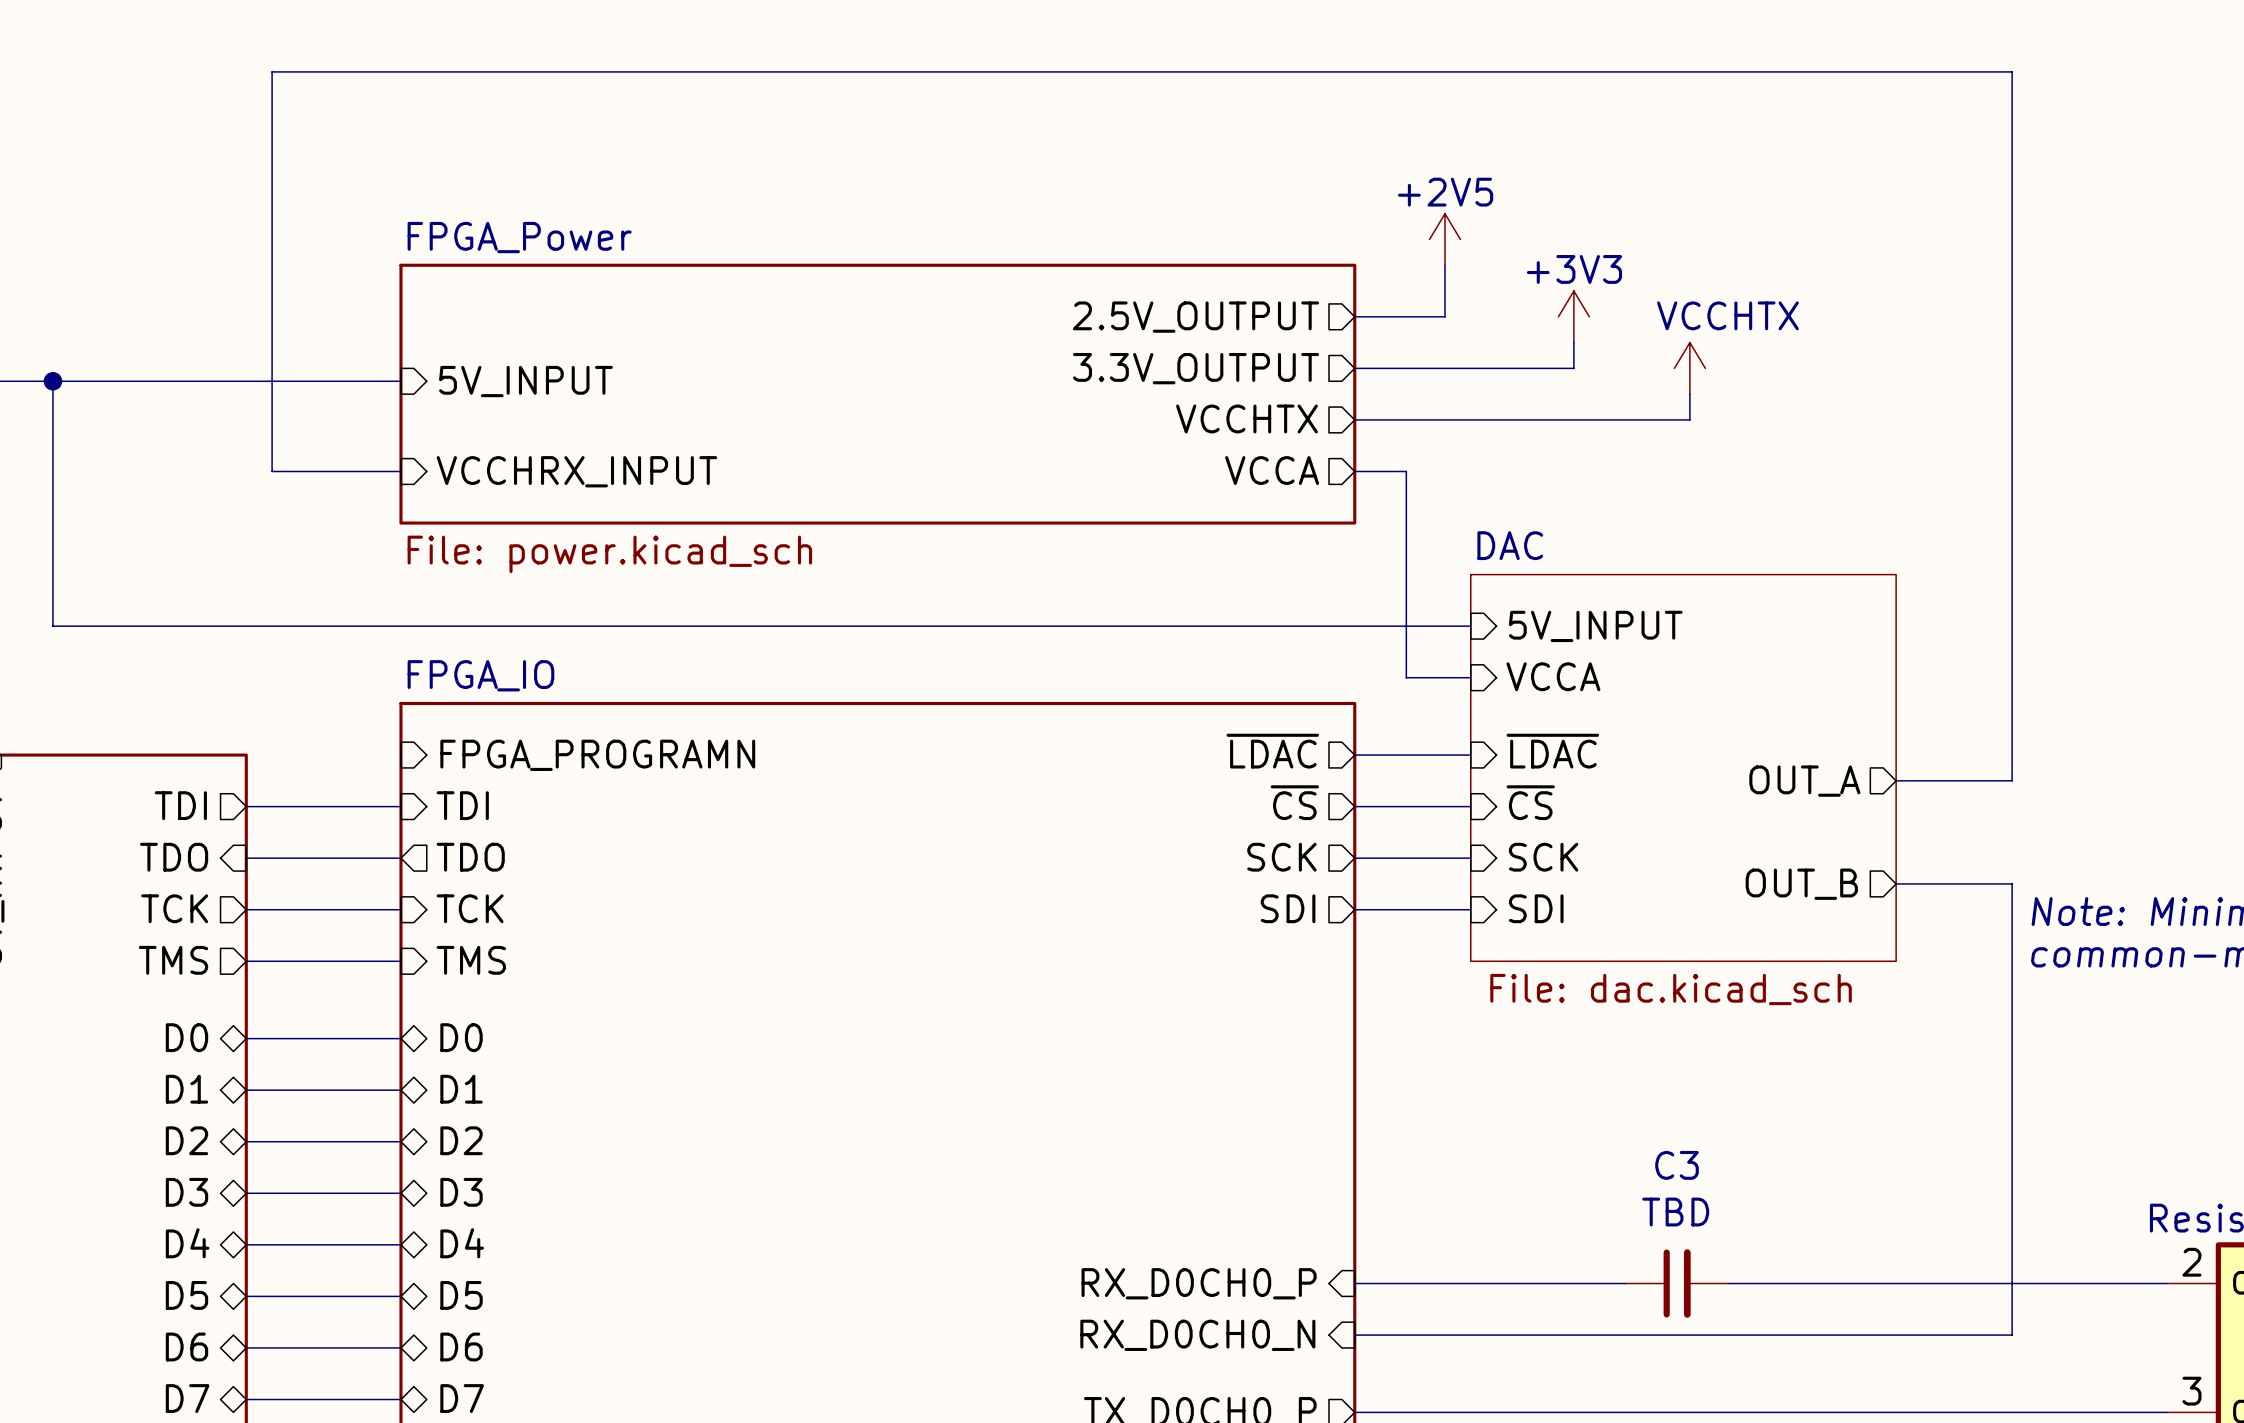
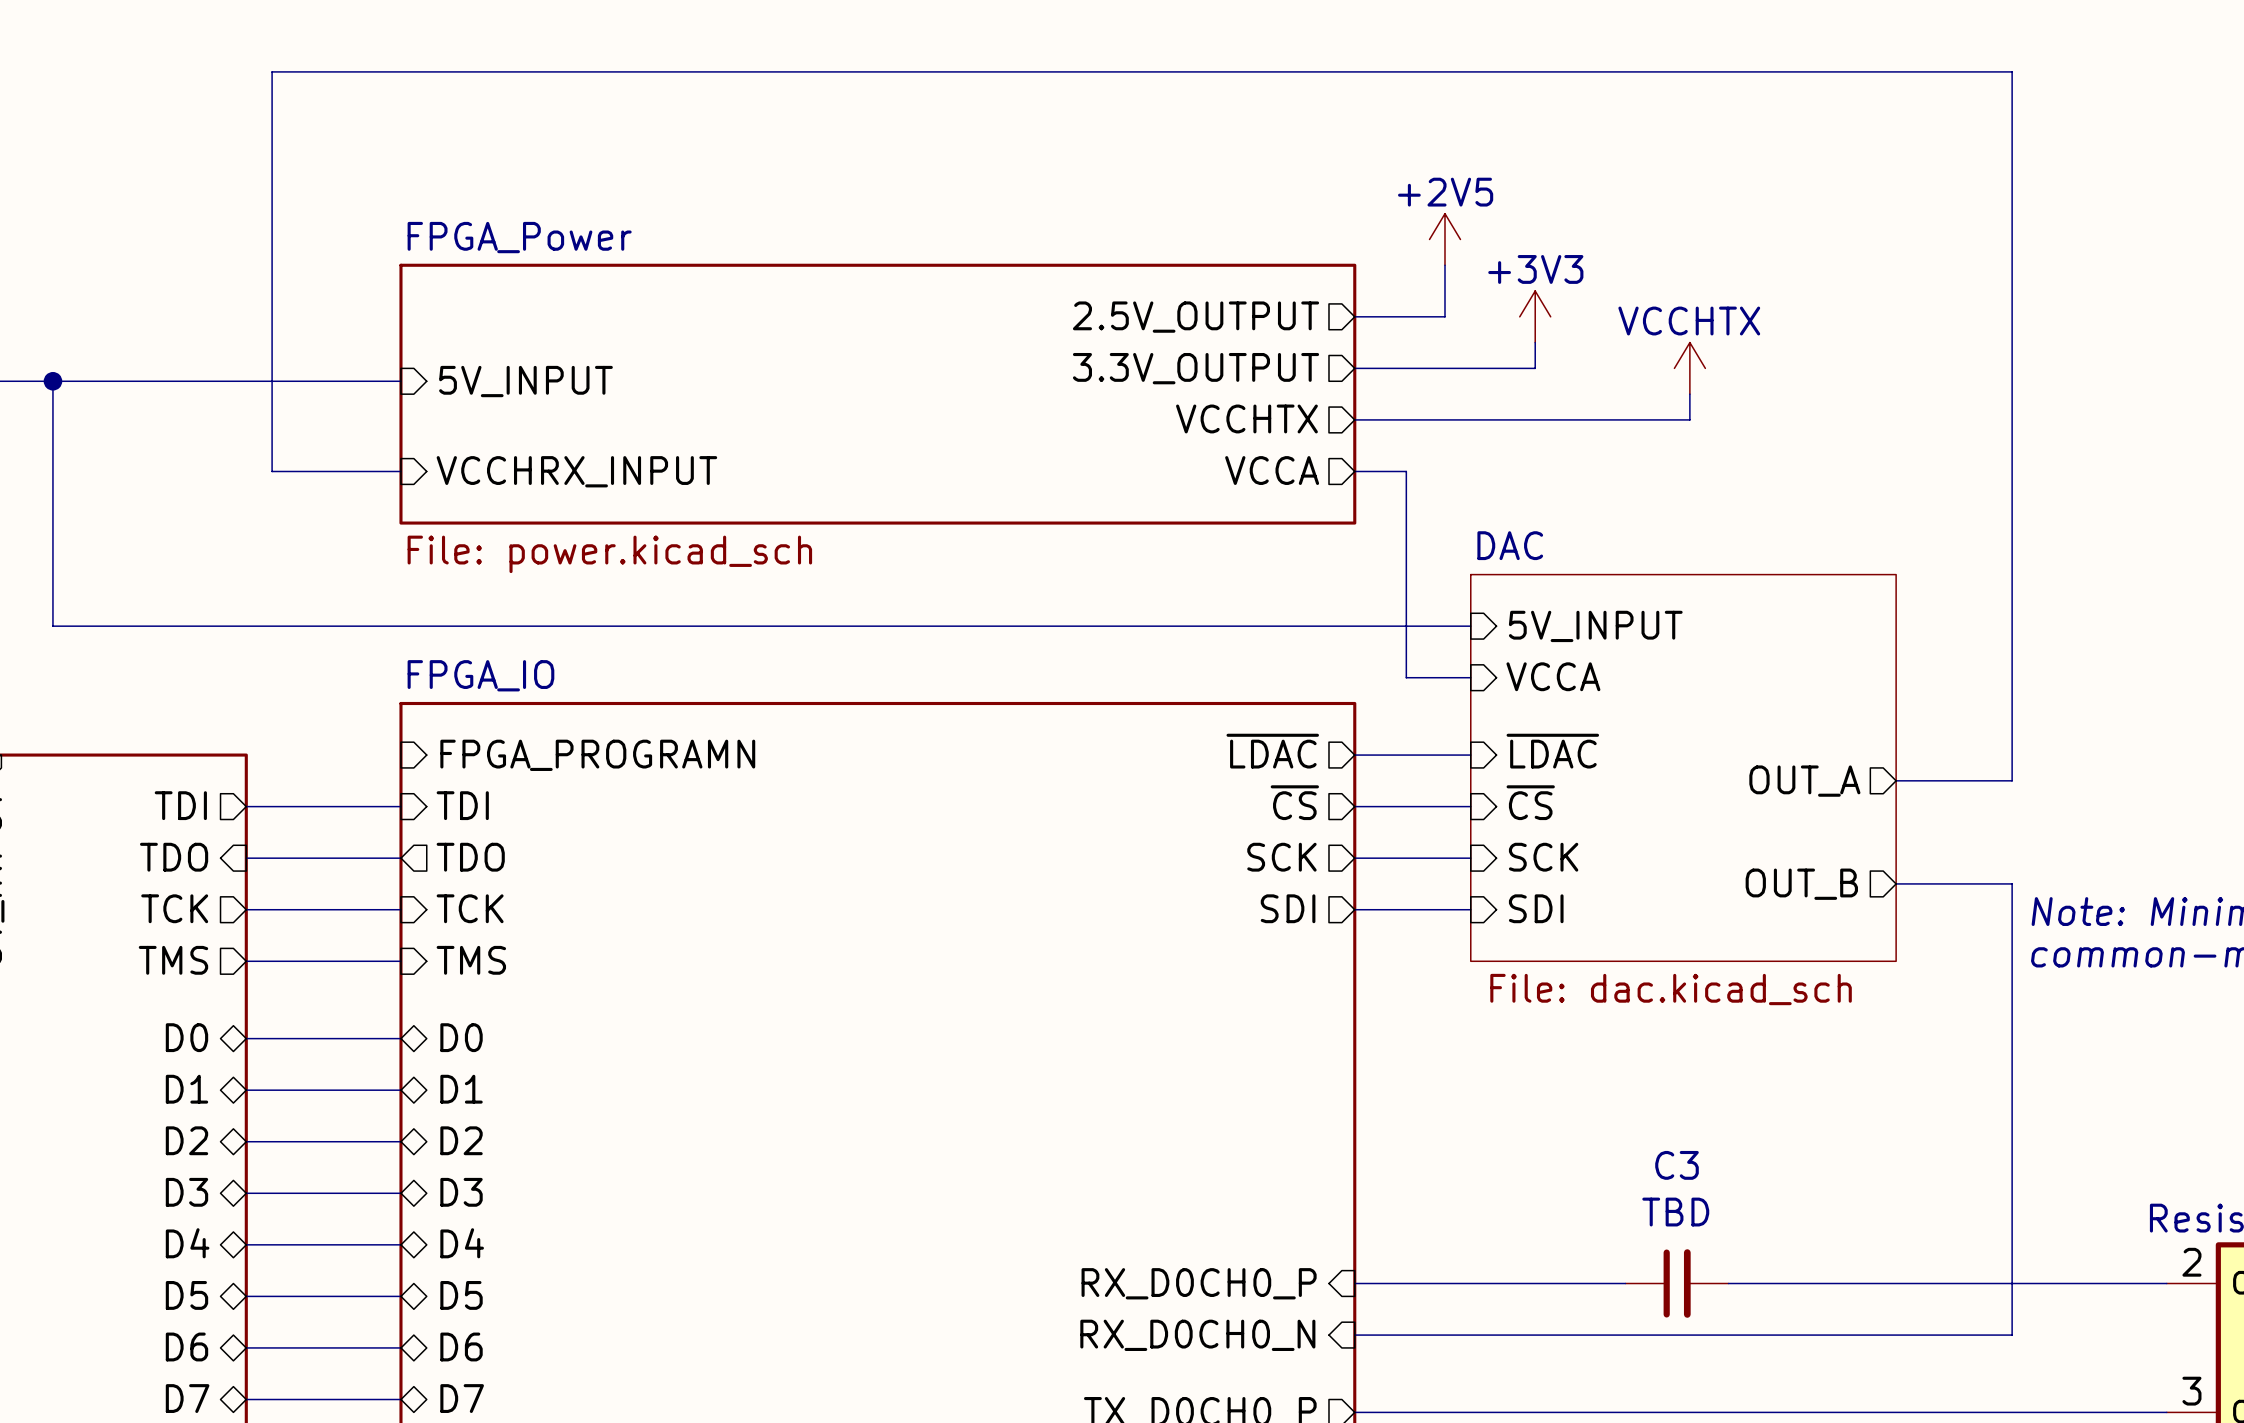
power symbol text position: VCCHTX (1727, 315) -> VCCHTX (1689, 321)
power symbol position: +3V3 (1573, 316) -> +3V3 (1535, 316)
wire: (1573, 342) (1573, 368) (1535, 368) -> (1535, 342) (1535, 368)

